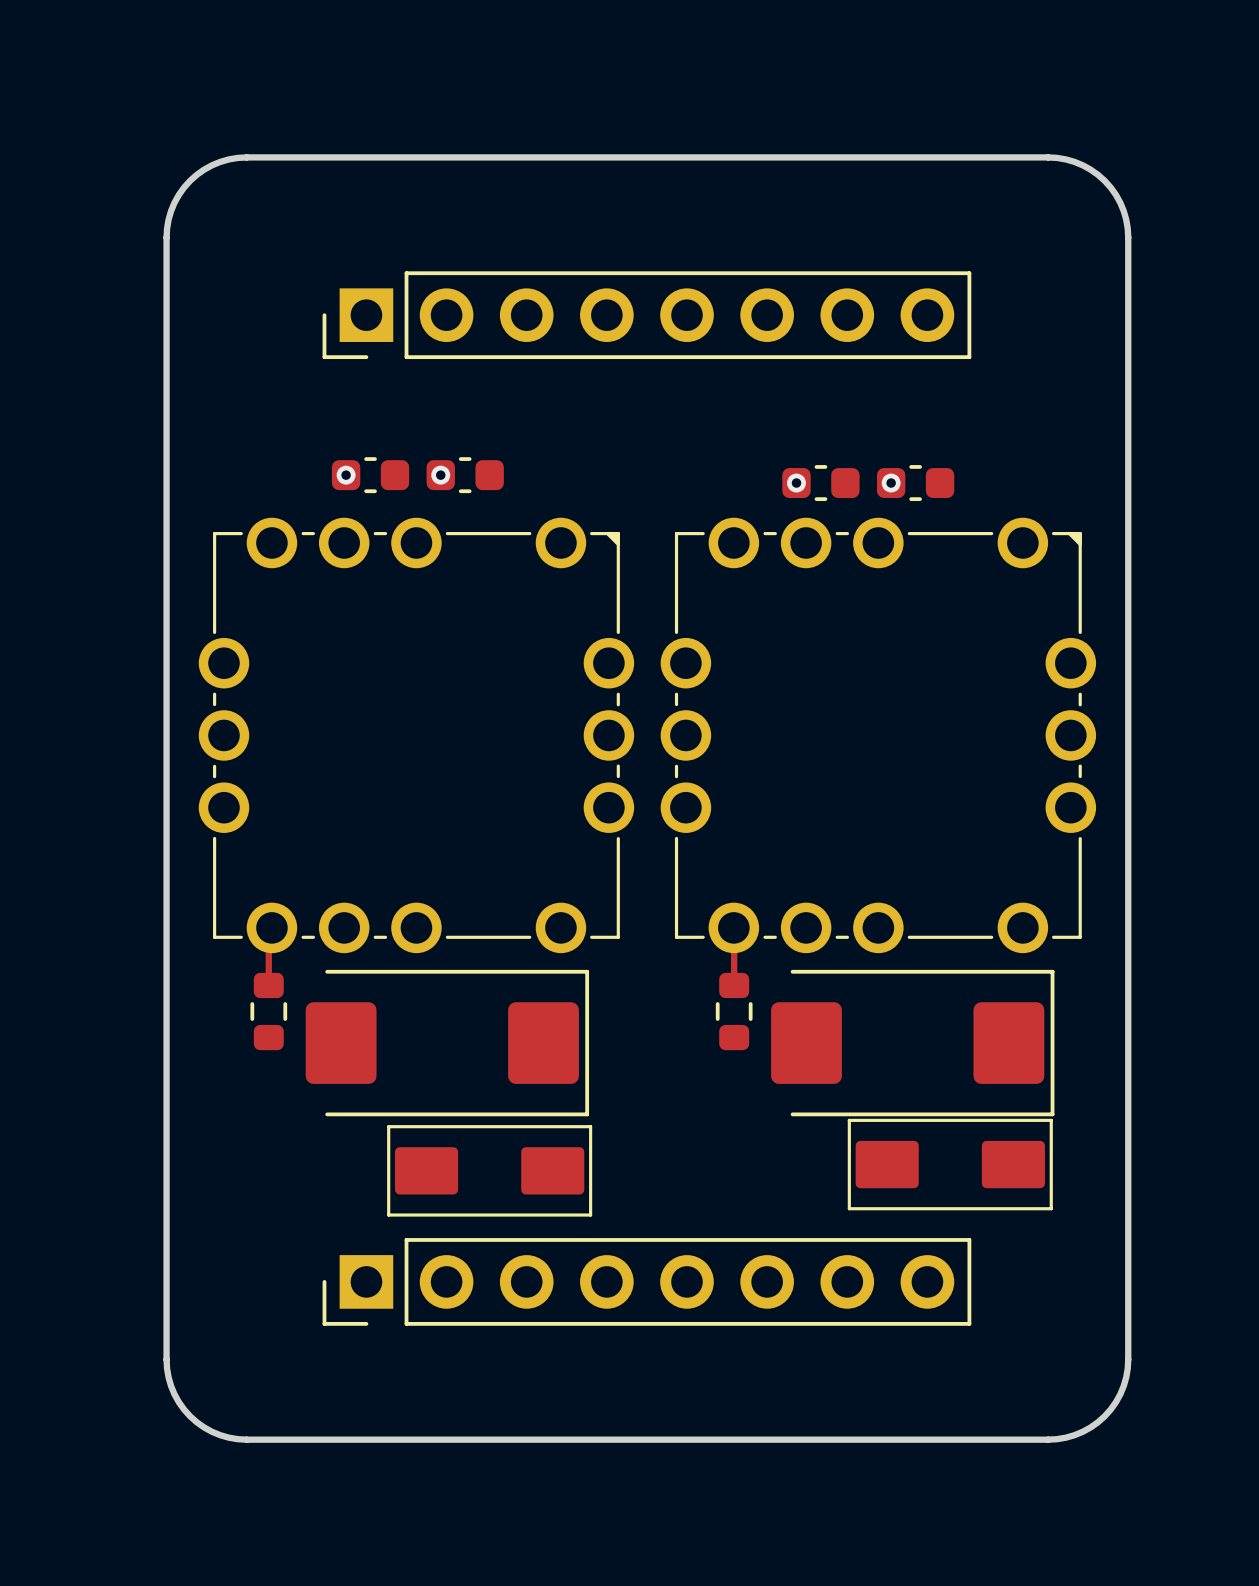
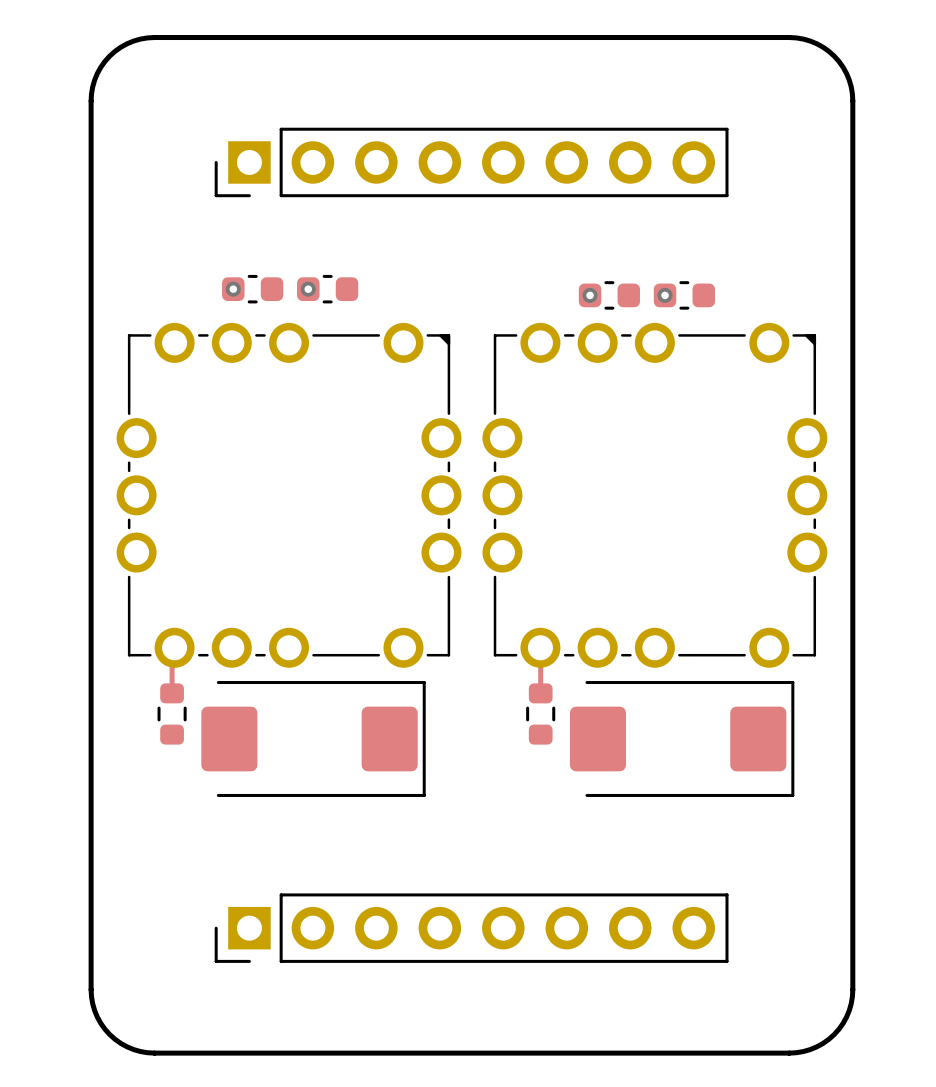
part: (950, 1164) -> none
part: (489, 1170) -> none

